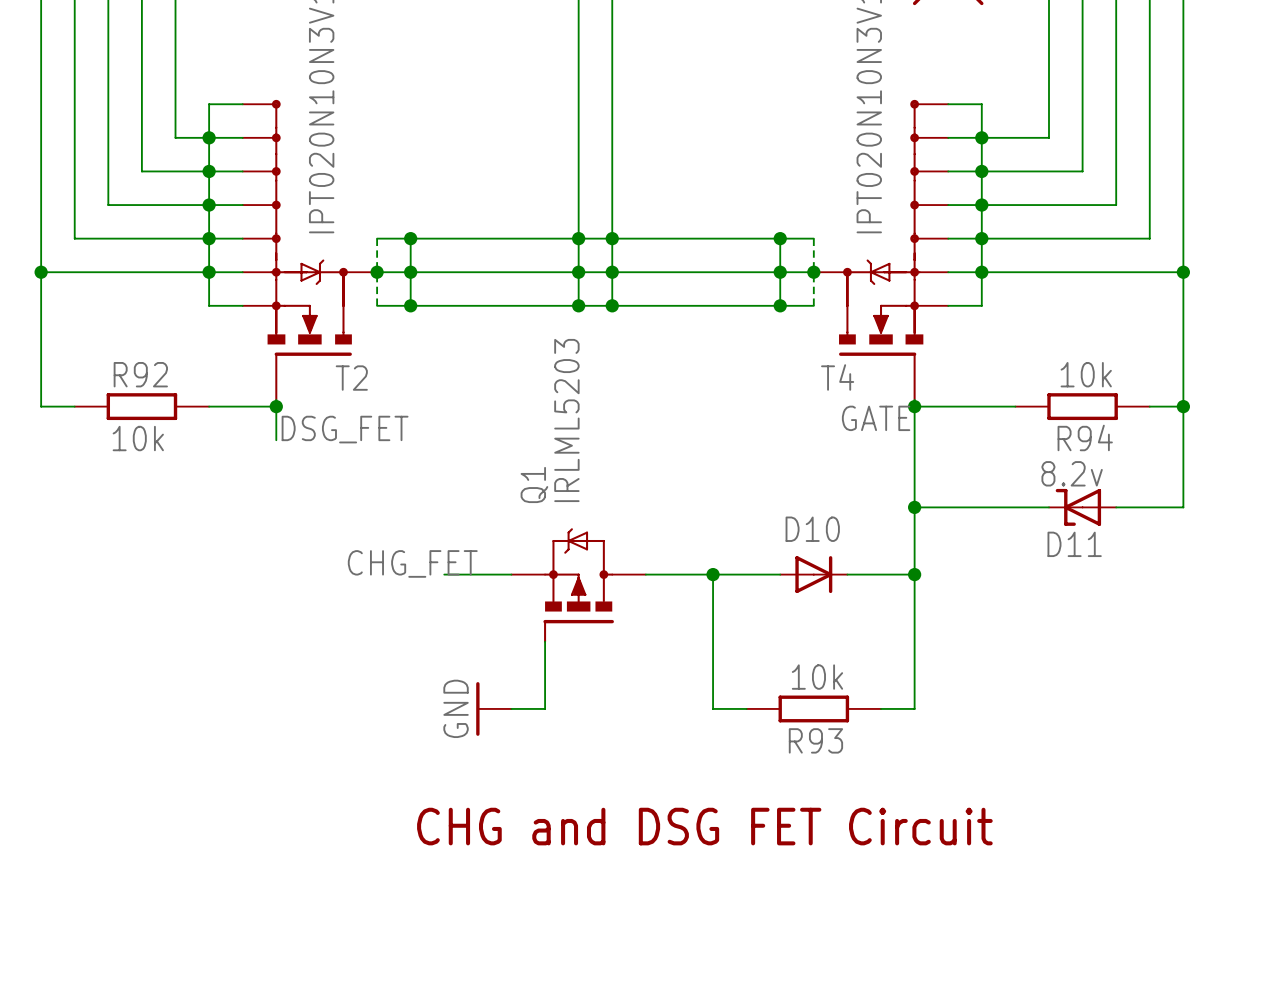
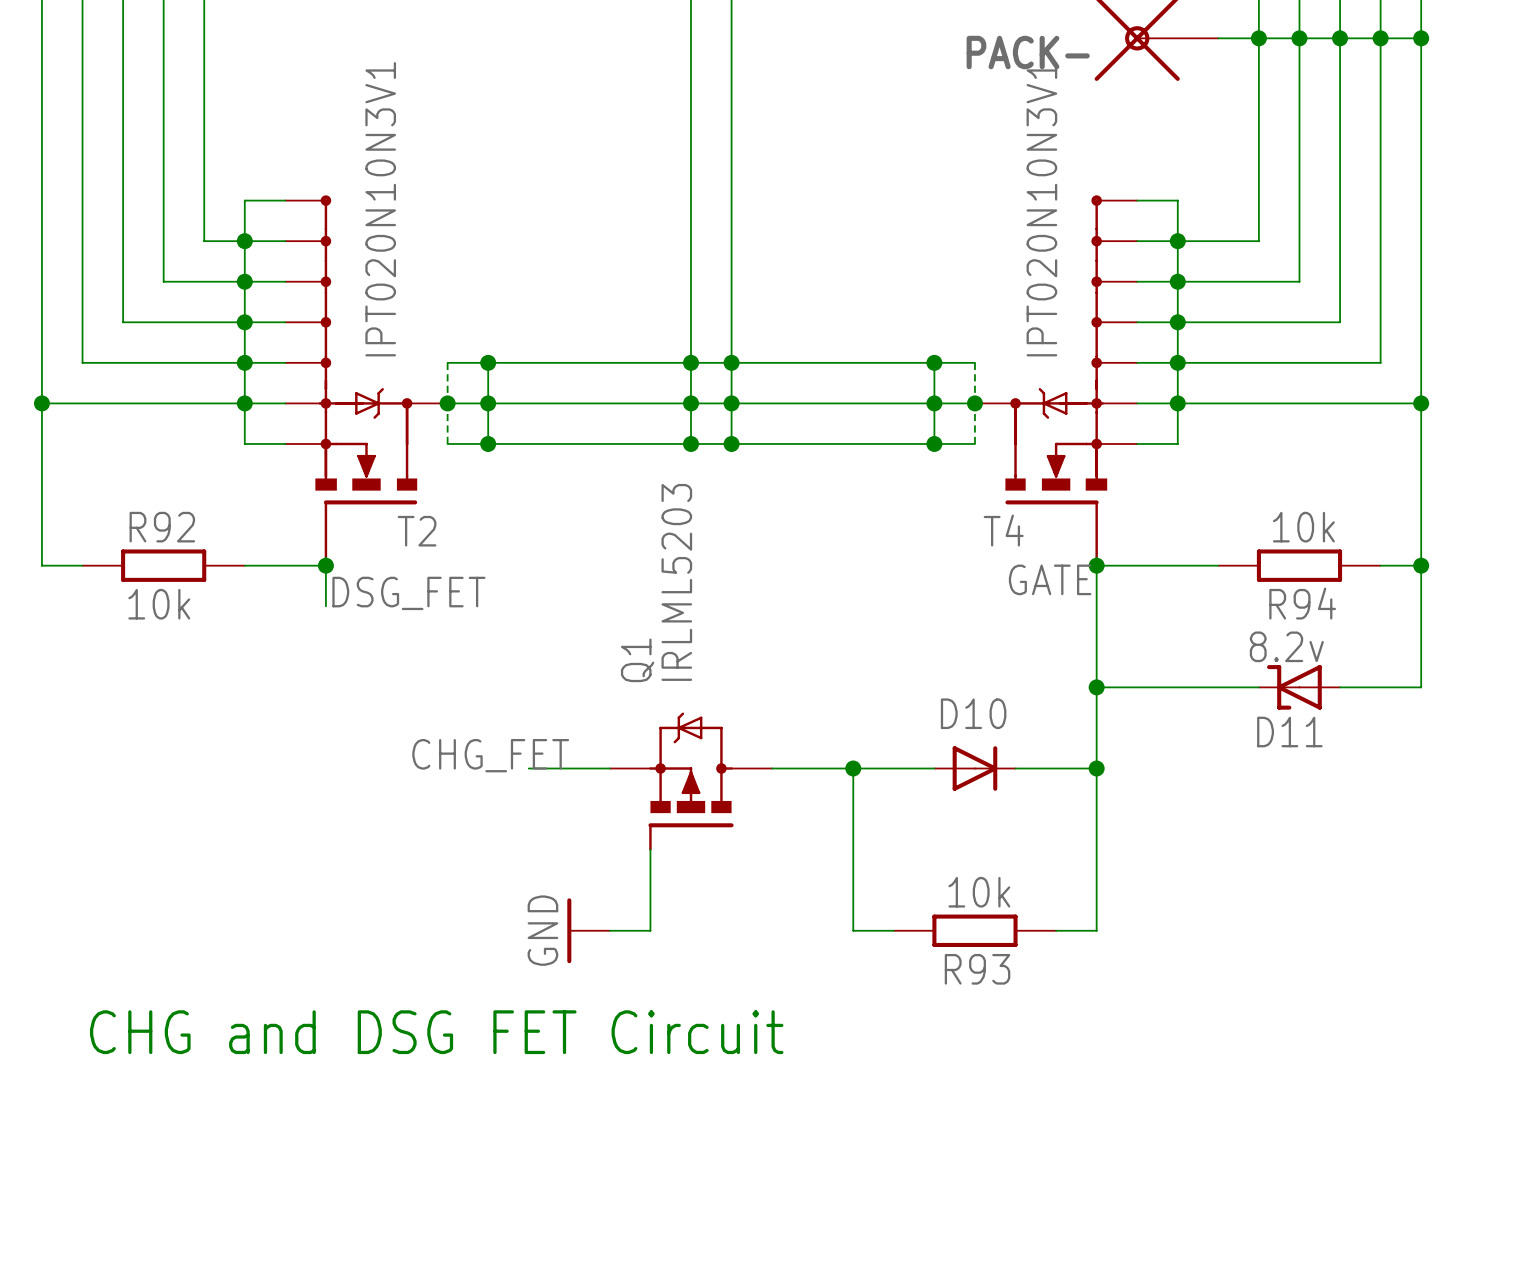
text: none -> CHG and DSG FET Circuit (436, 1032)
text: CHG and DSG FET Circuit (704, 826) -> none

